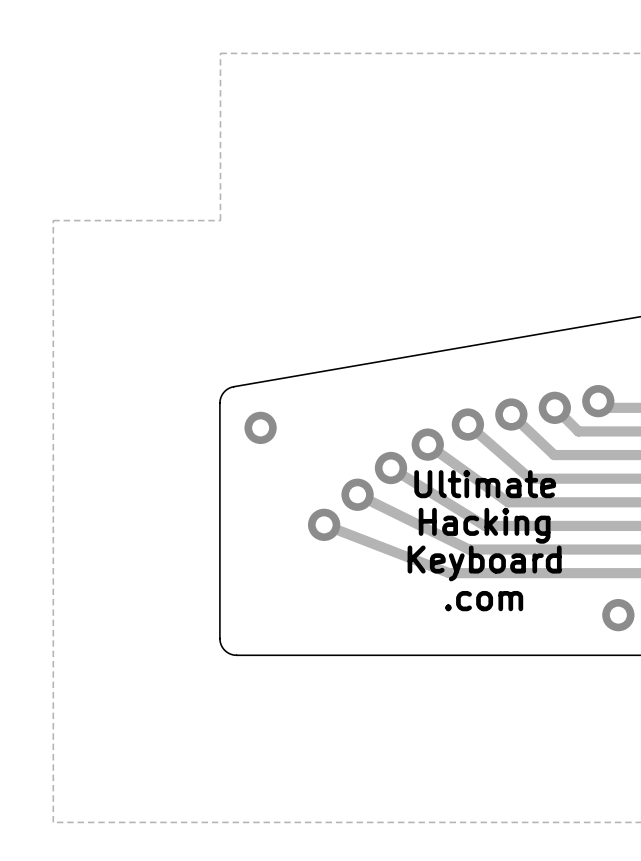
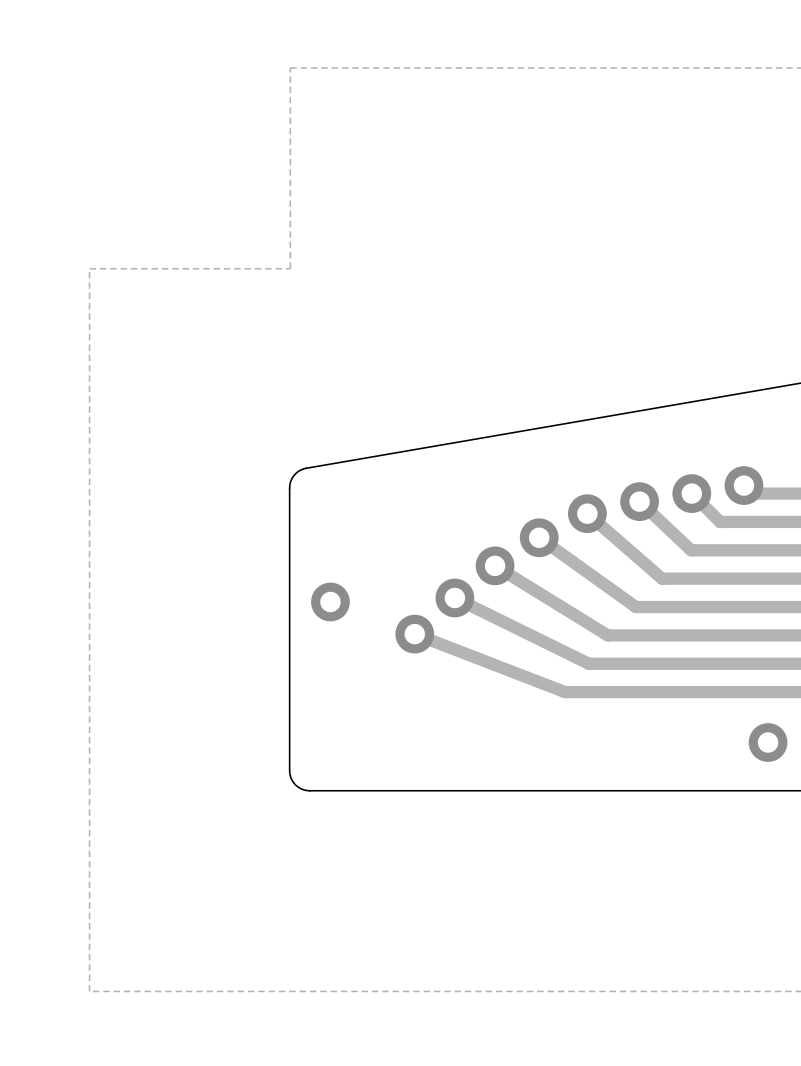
part position: (260, 427) -> (330, 601)
text: Ultimate (485, 484) -> none
text: Hacking (484, 525) -> none
text: Keyboard (484, 563) -> none
text: .com (484, 601) -> none

